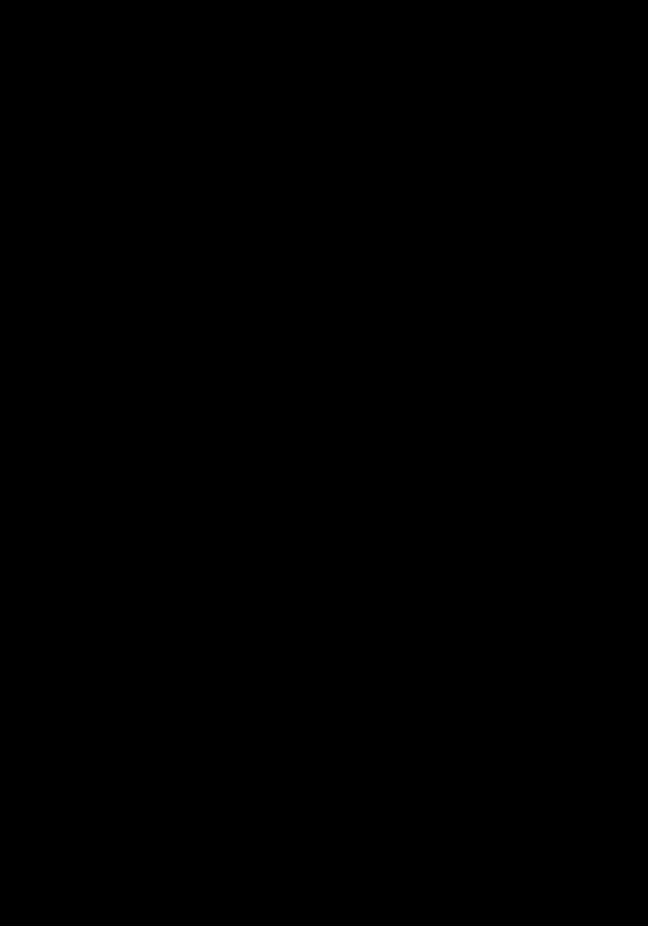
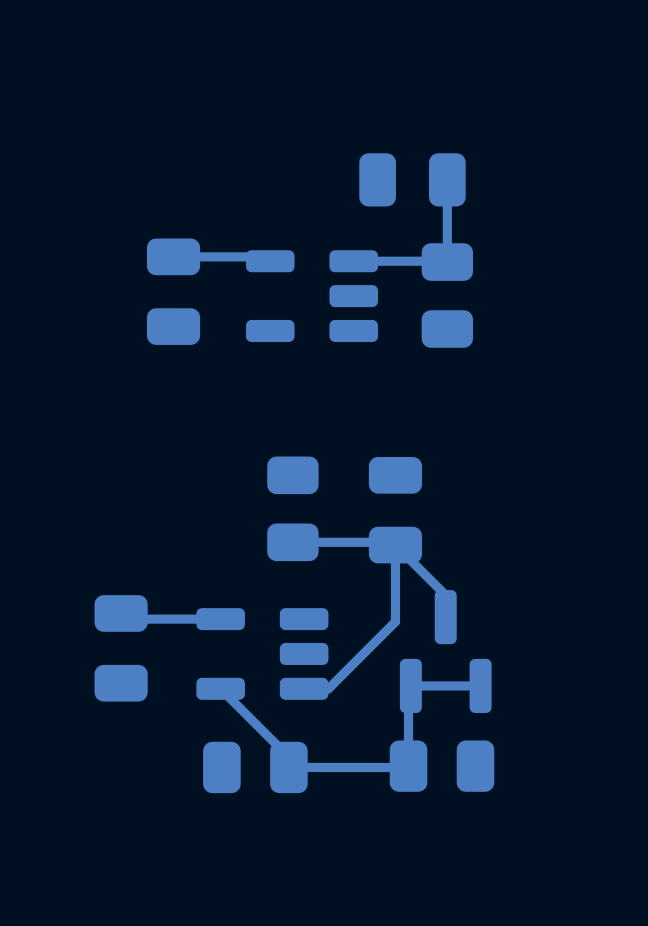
part: none -> (412, 179)
bottom track: none -> (447, 179) (447, 262) (353, 261)
bottom track: none -> (173, 256) (265, 256) (270, 261)
part: none -> (173, 291)
part: none -> (447, 295)
part: none -> (311, 296)
part: none -> (292, 508)
part: none -> (395, 510)
bottom track: none -> (292, 542) (392, 542) (445, 595) (445, 617)
bottom track: none -> (408, 553) (400, 545) (395, 545) (395, 621) (328, 688) (304, 688)
bottom track: none -> (121, 613) (126, 619) (220, 619)
part: none -> (121, 648)
part: none -> (445, 651)
part: none -> (262, 653)
bottom track: none -> (480, 685) (410, 685) (408, 688) (407, 767) (288, 767) (288, 757) (220, 688)
part: none -> (442, 766)
part: none -> (255, 767)

